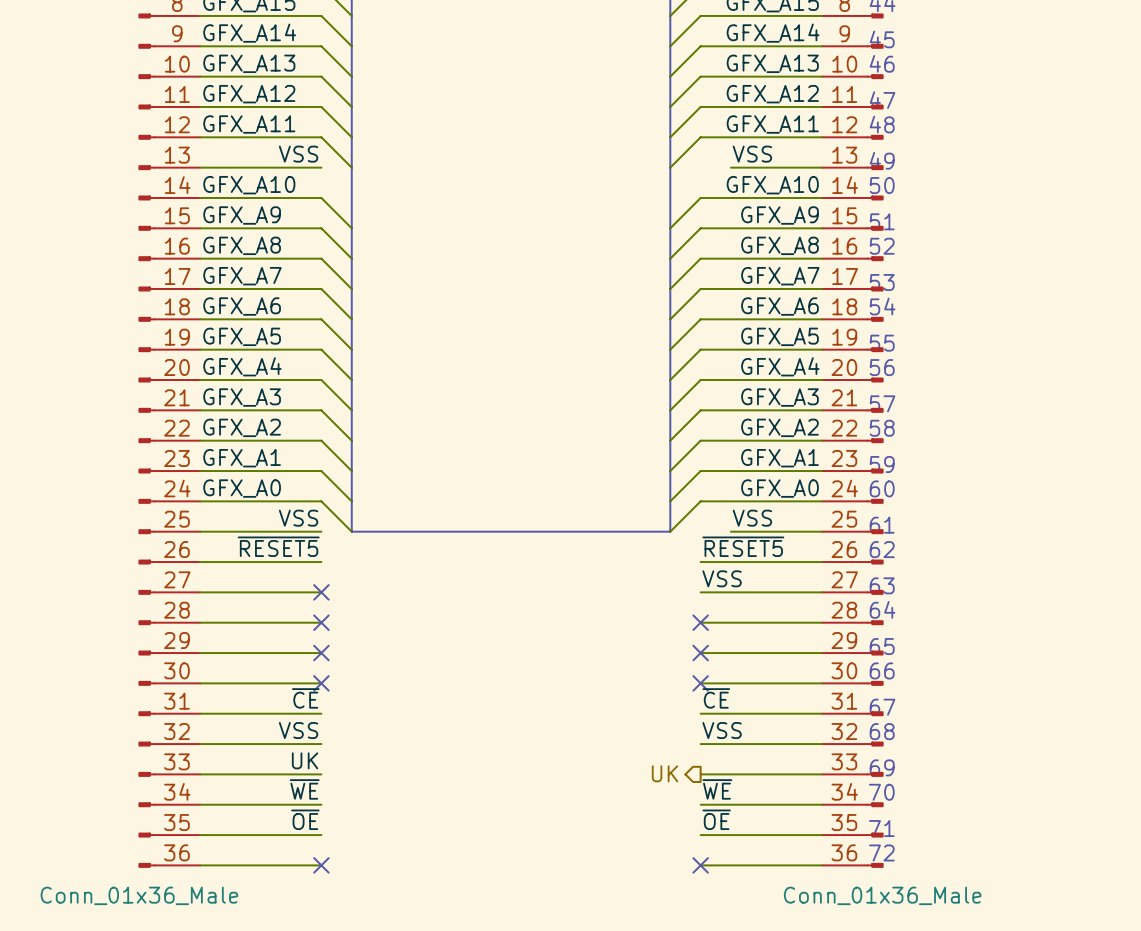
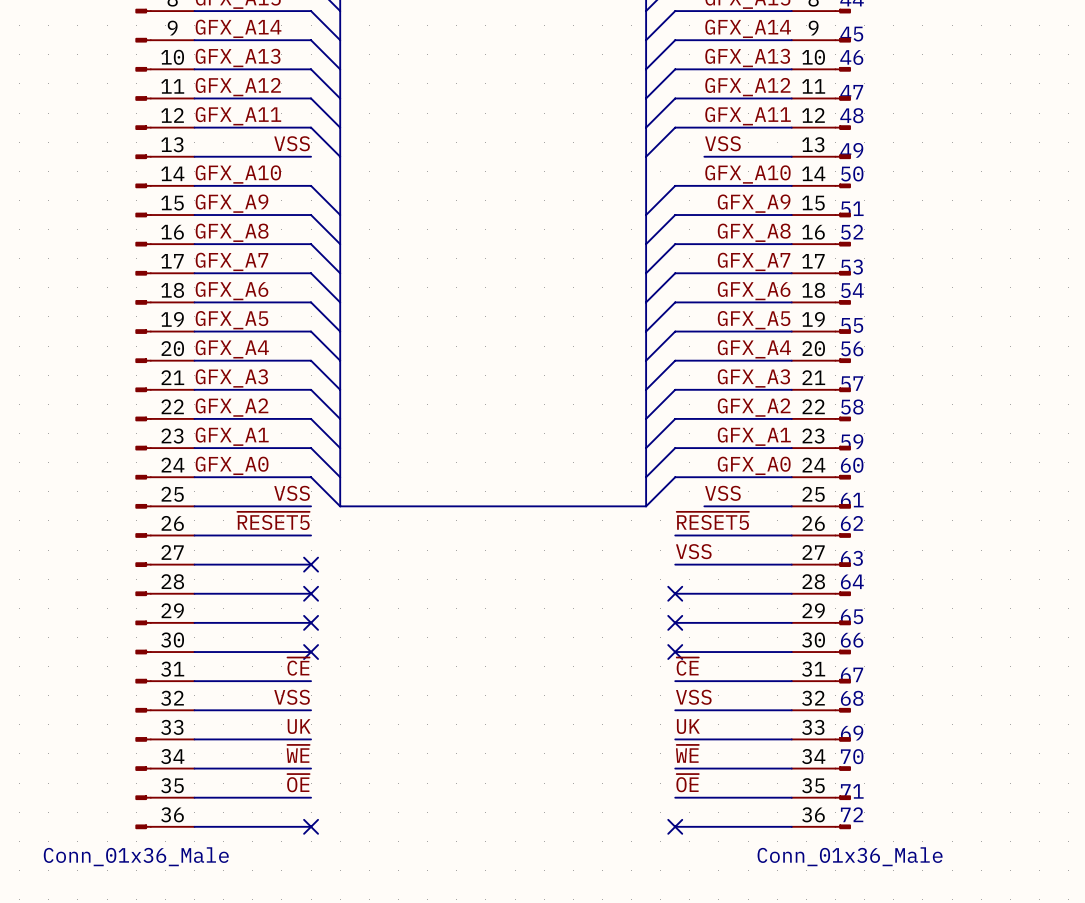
label: none -> UK (688, 726)
hierarchical label: UK (665, 773) -> none

